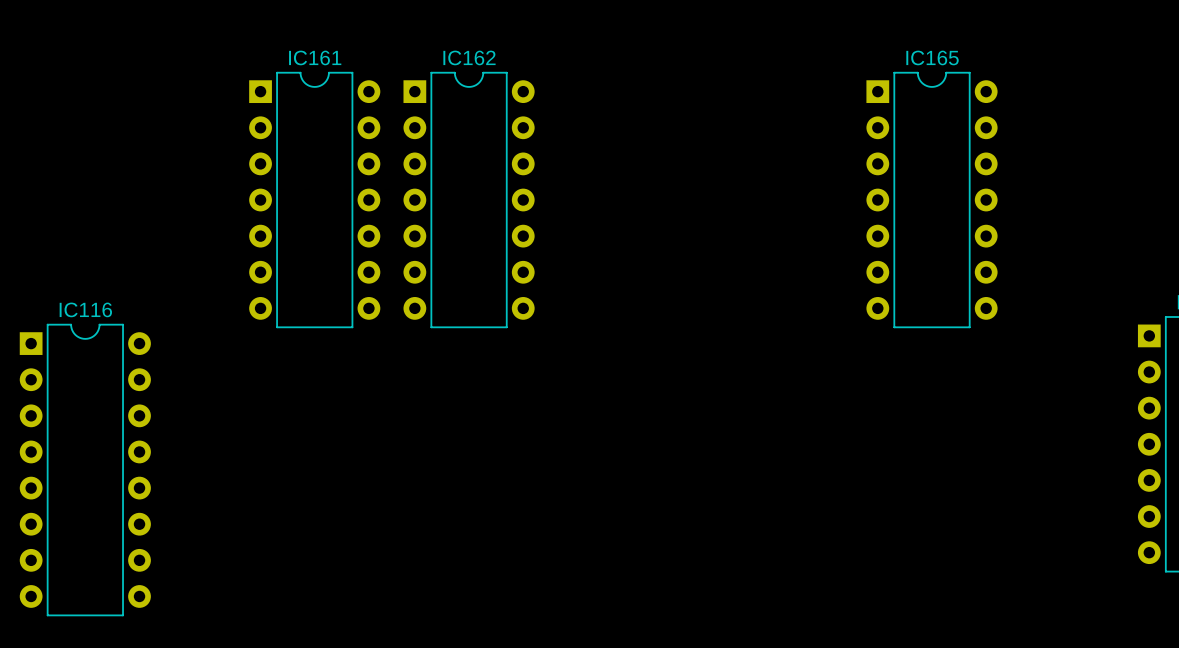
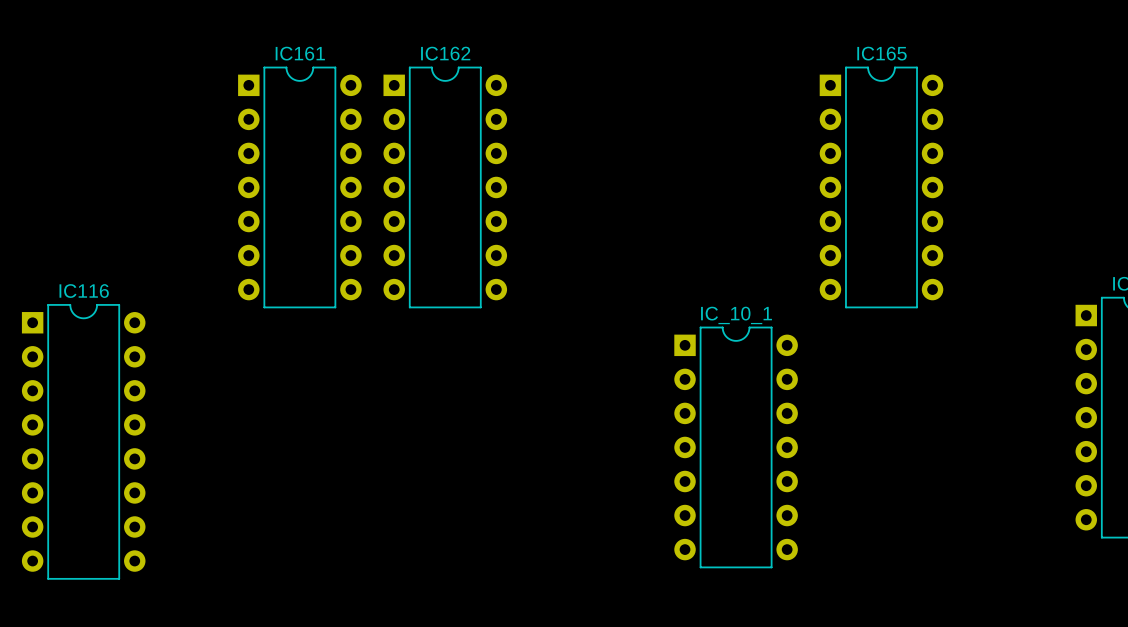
IC_10_1: none -> (736, 447)

